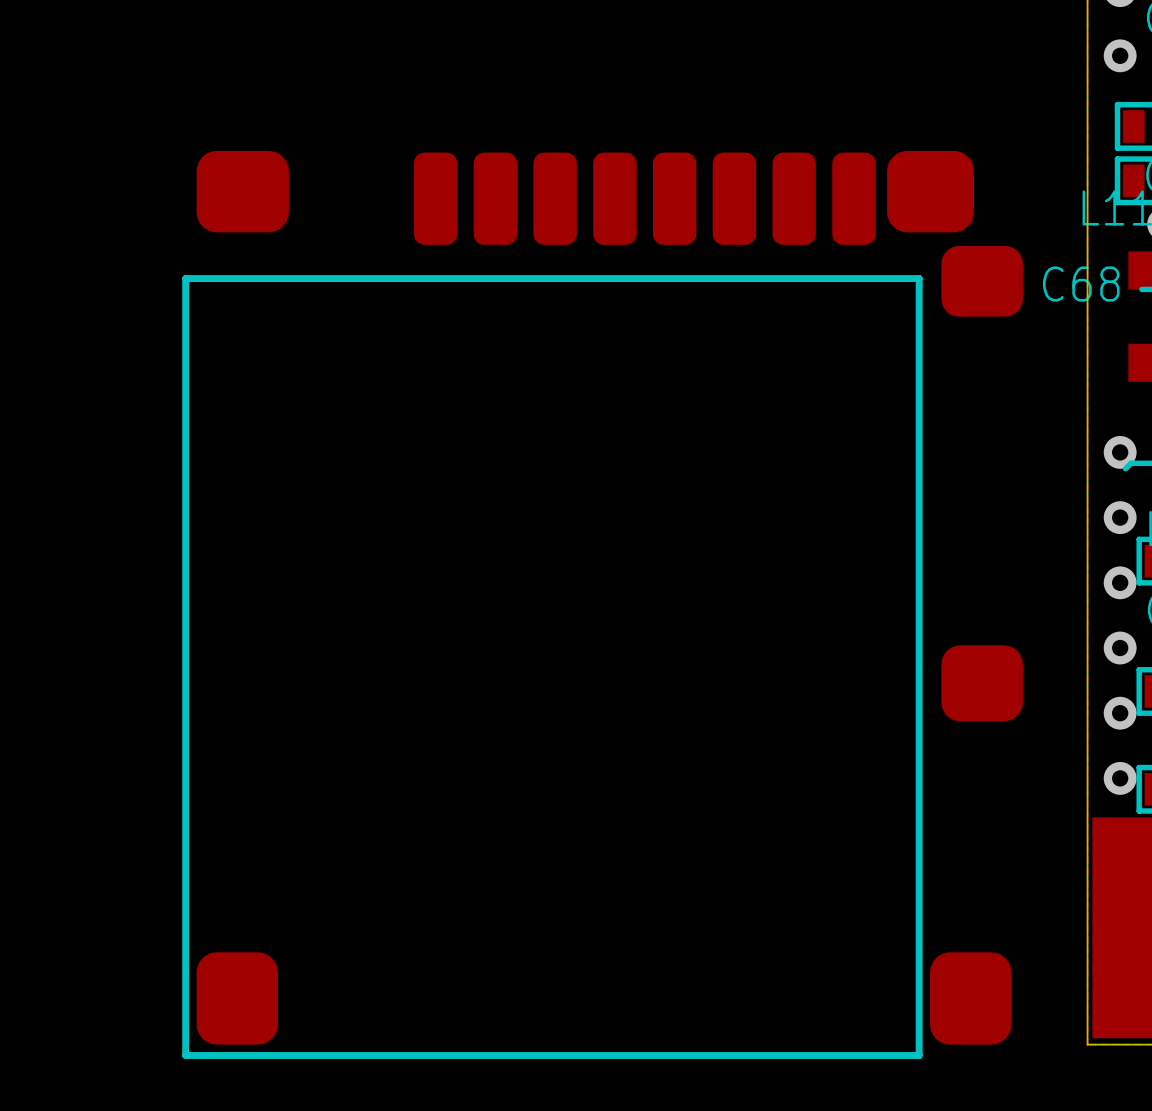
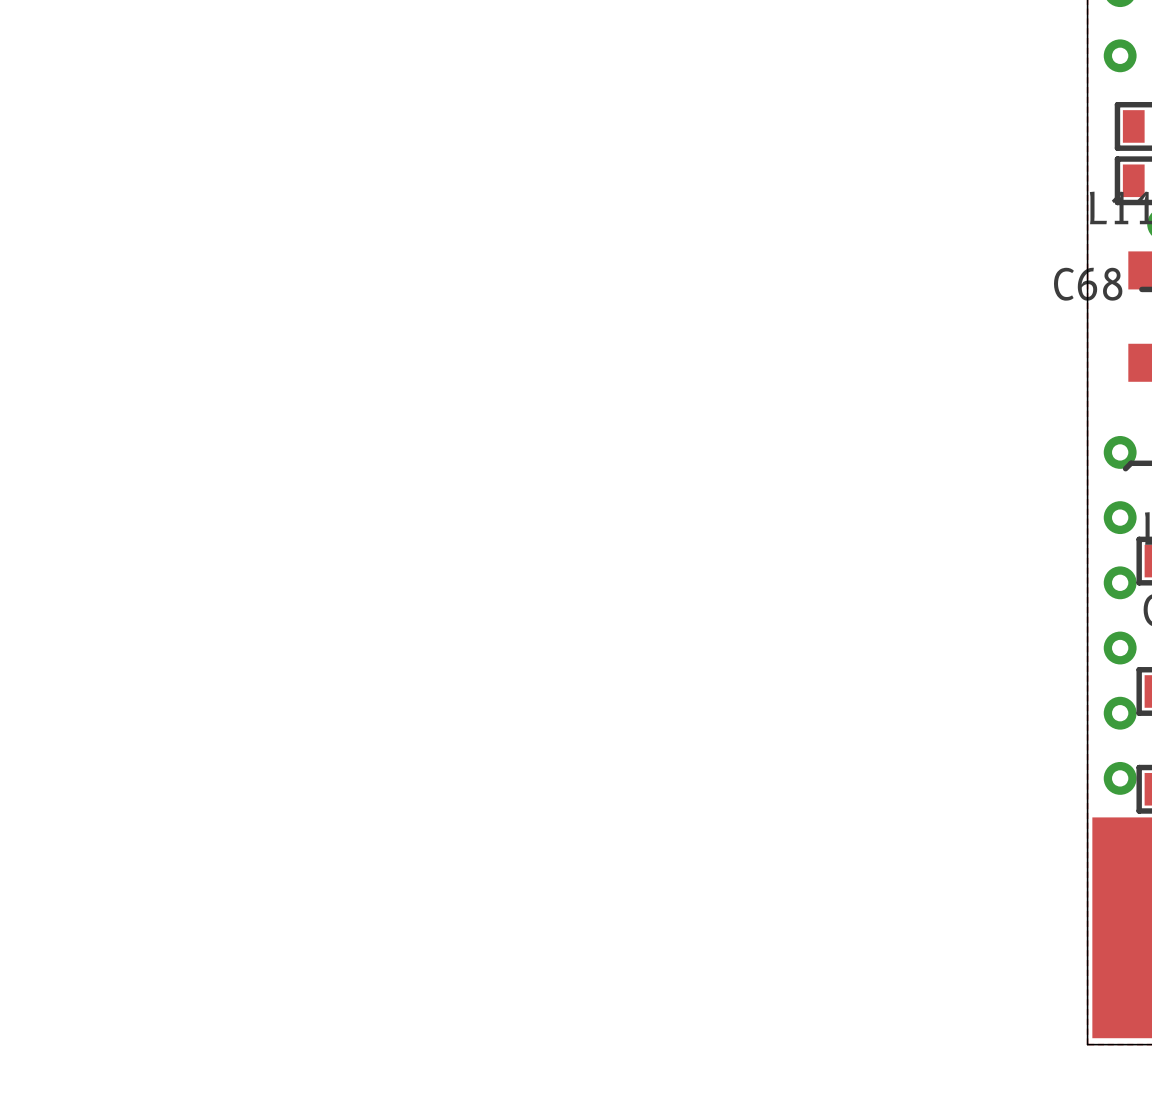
part: (602, 604) -> none

